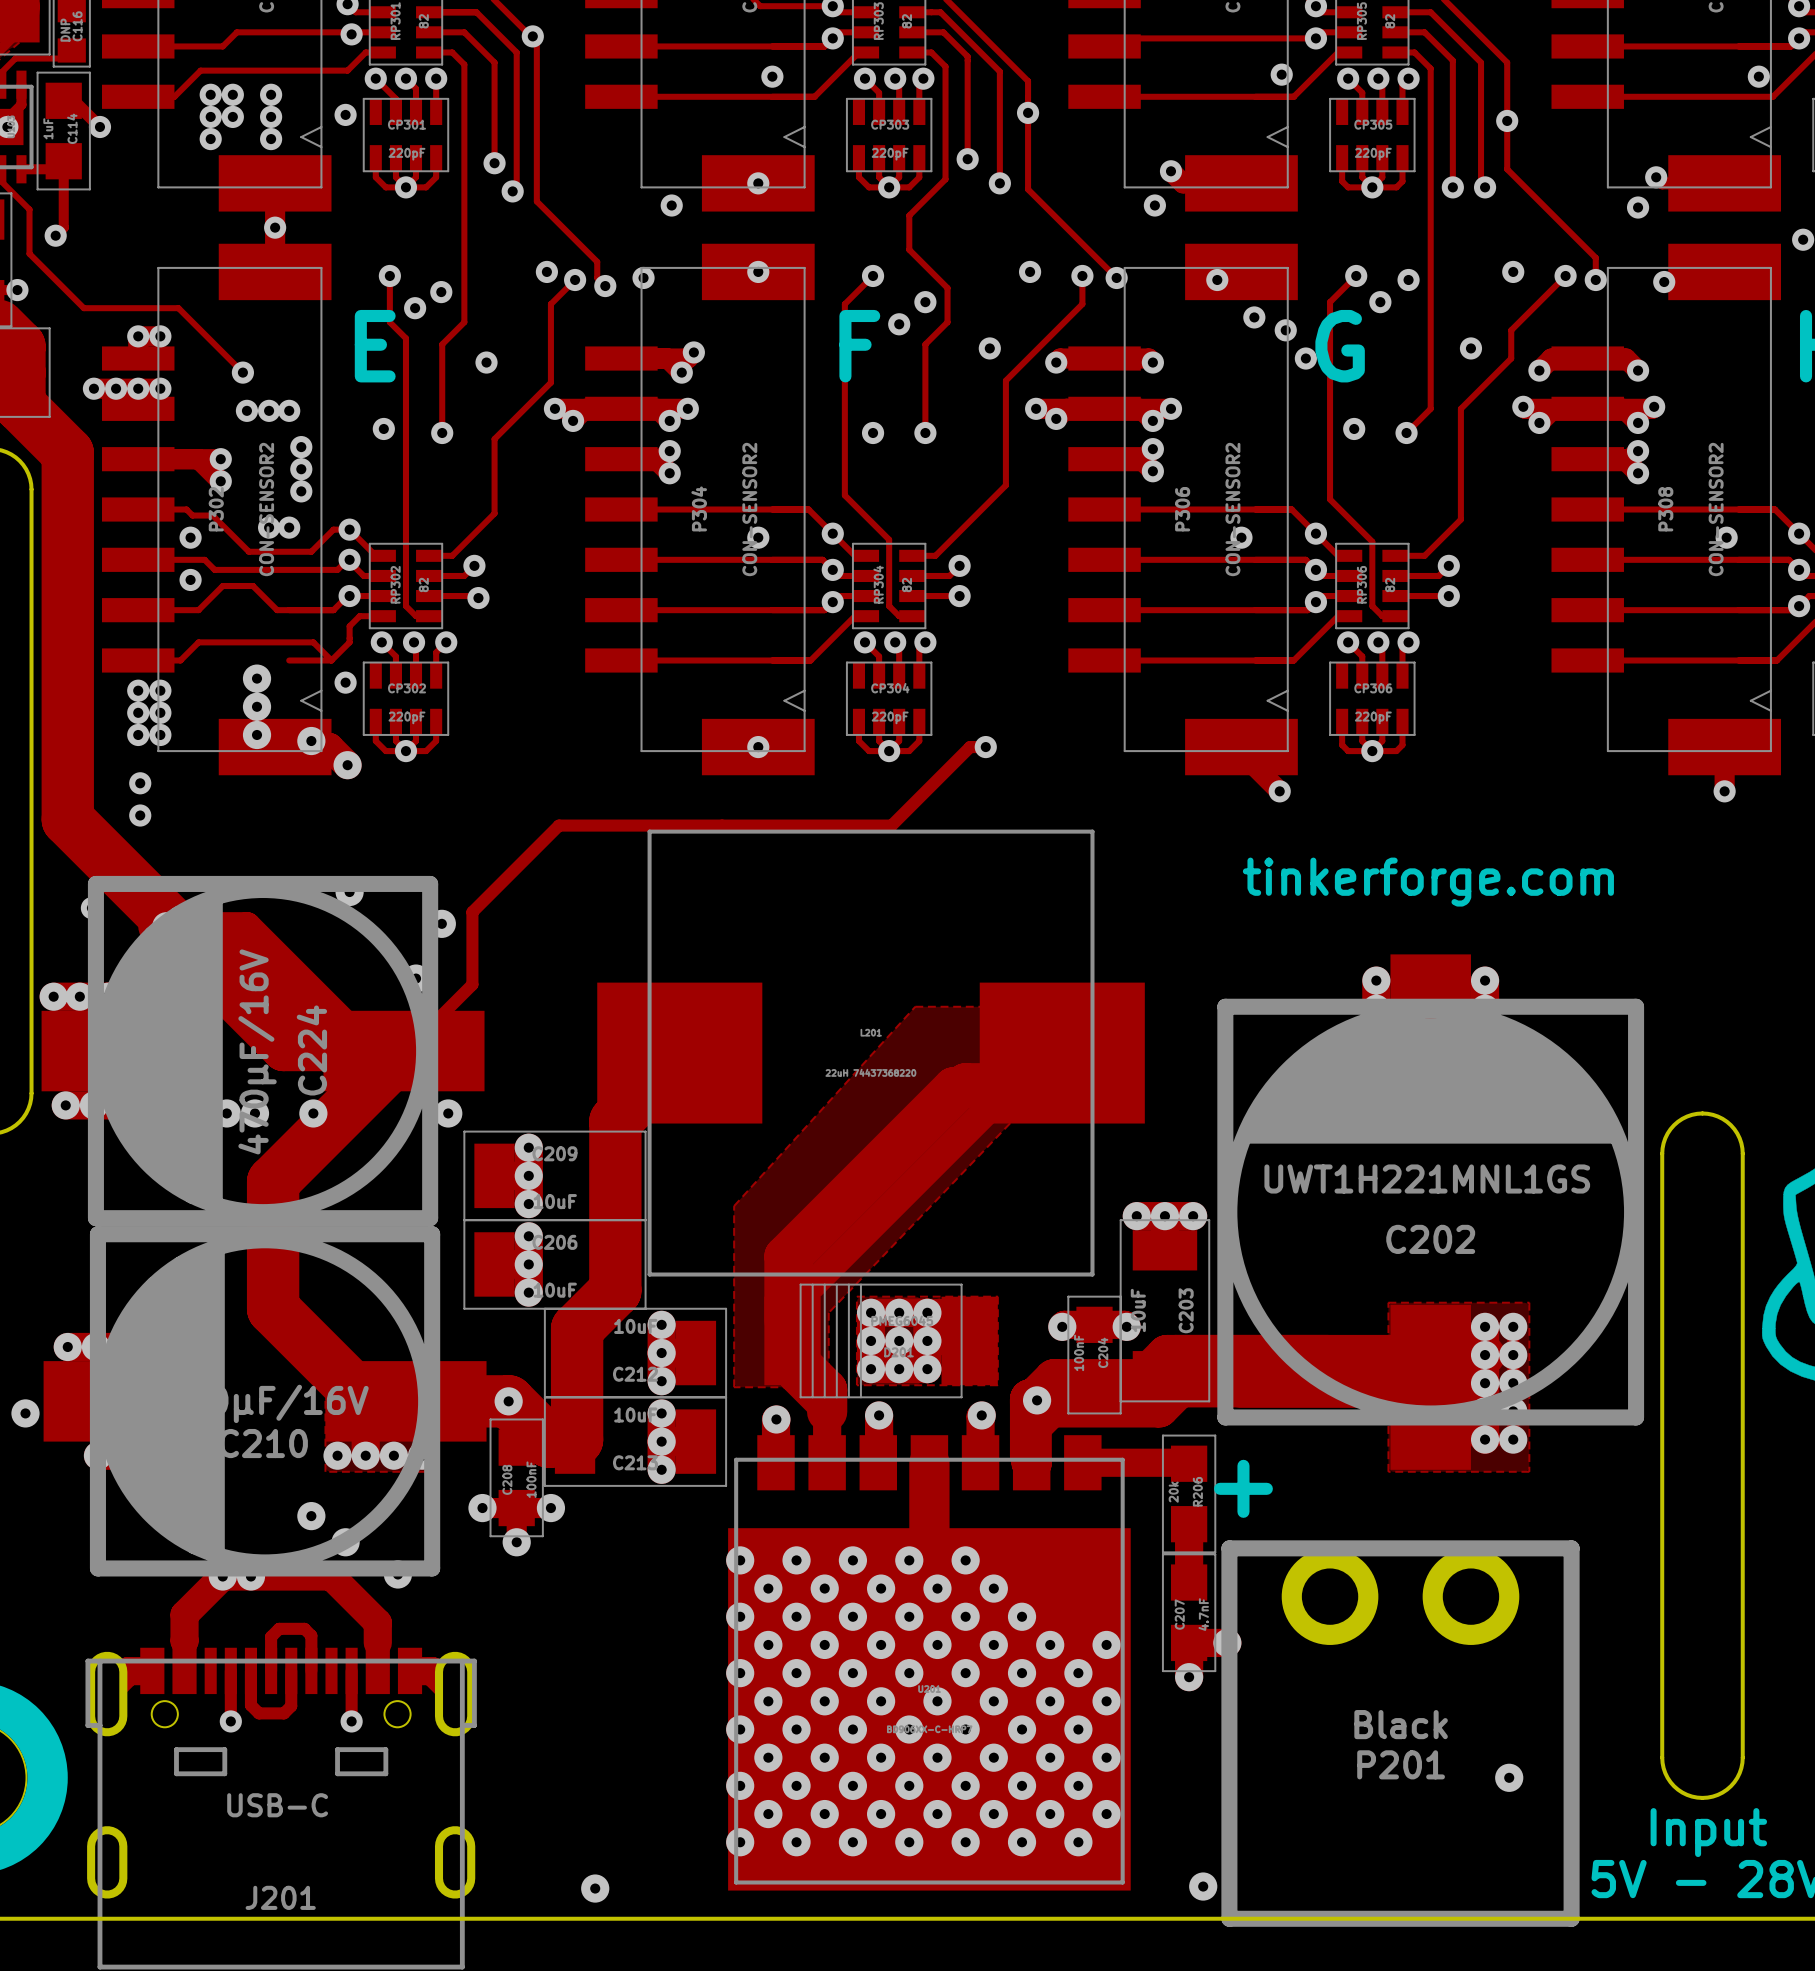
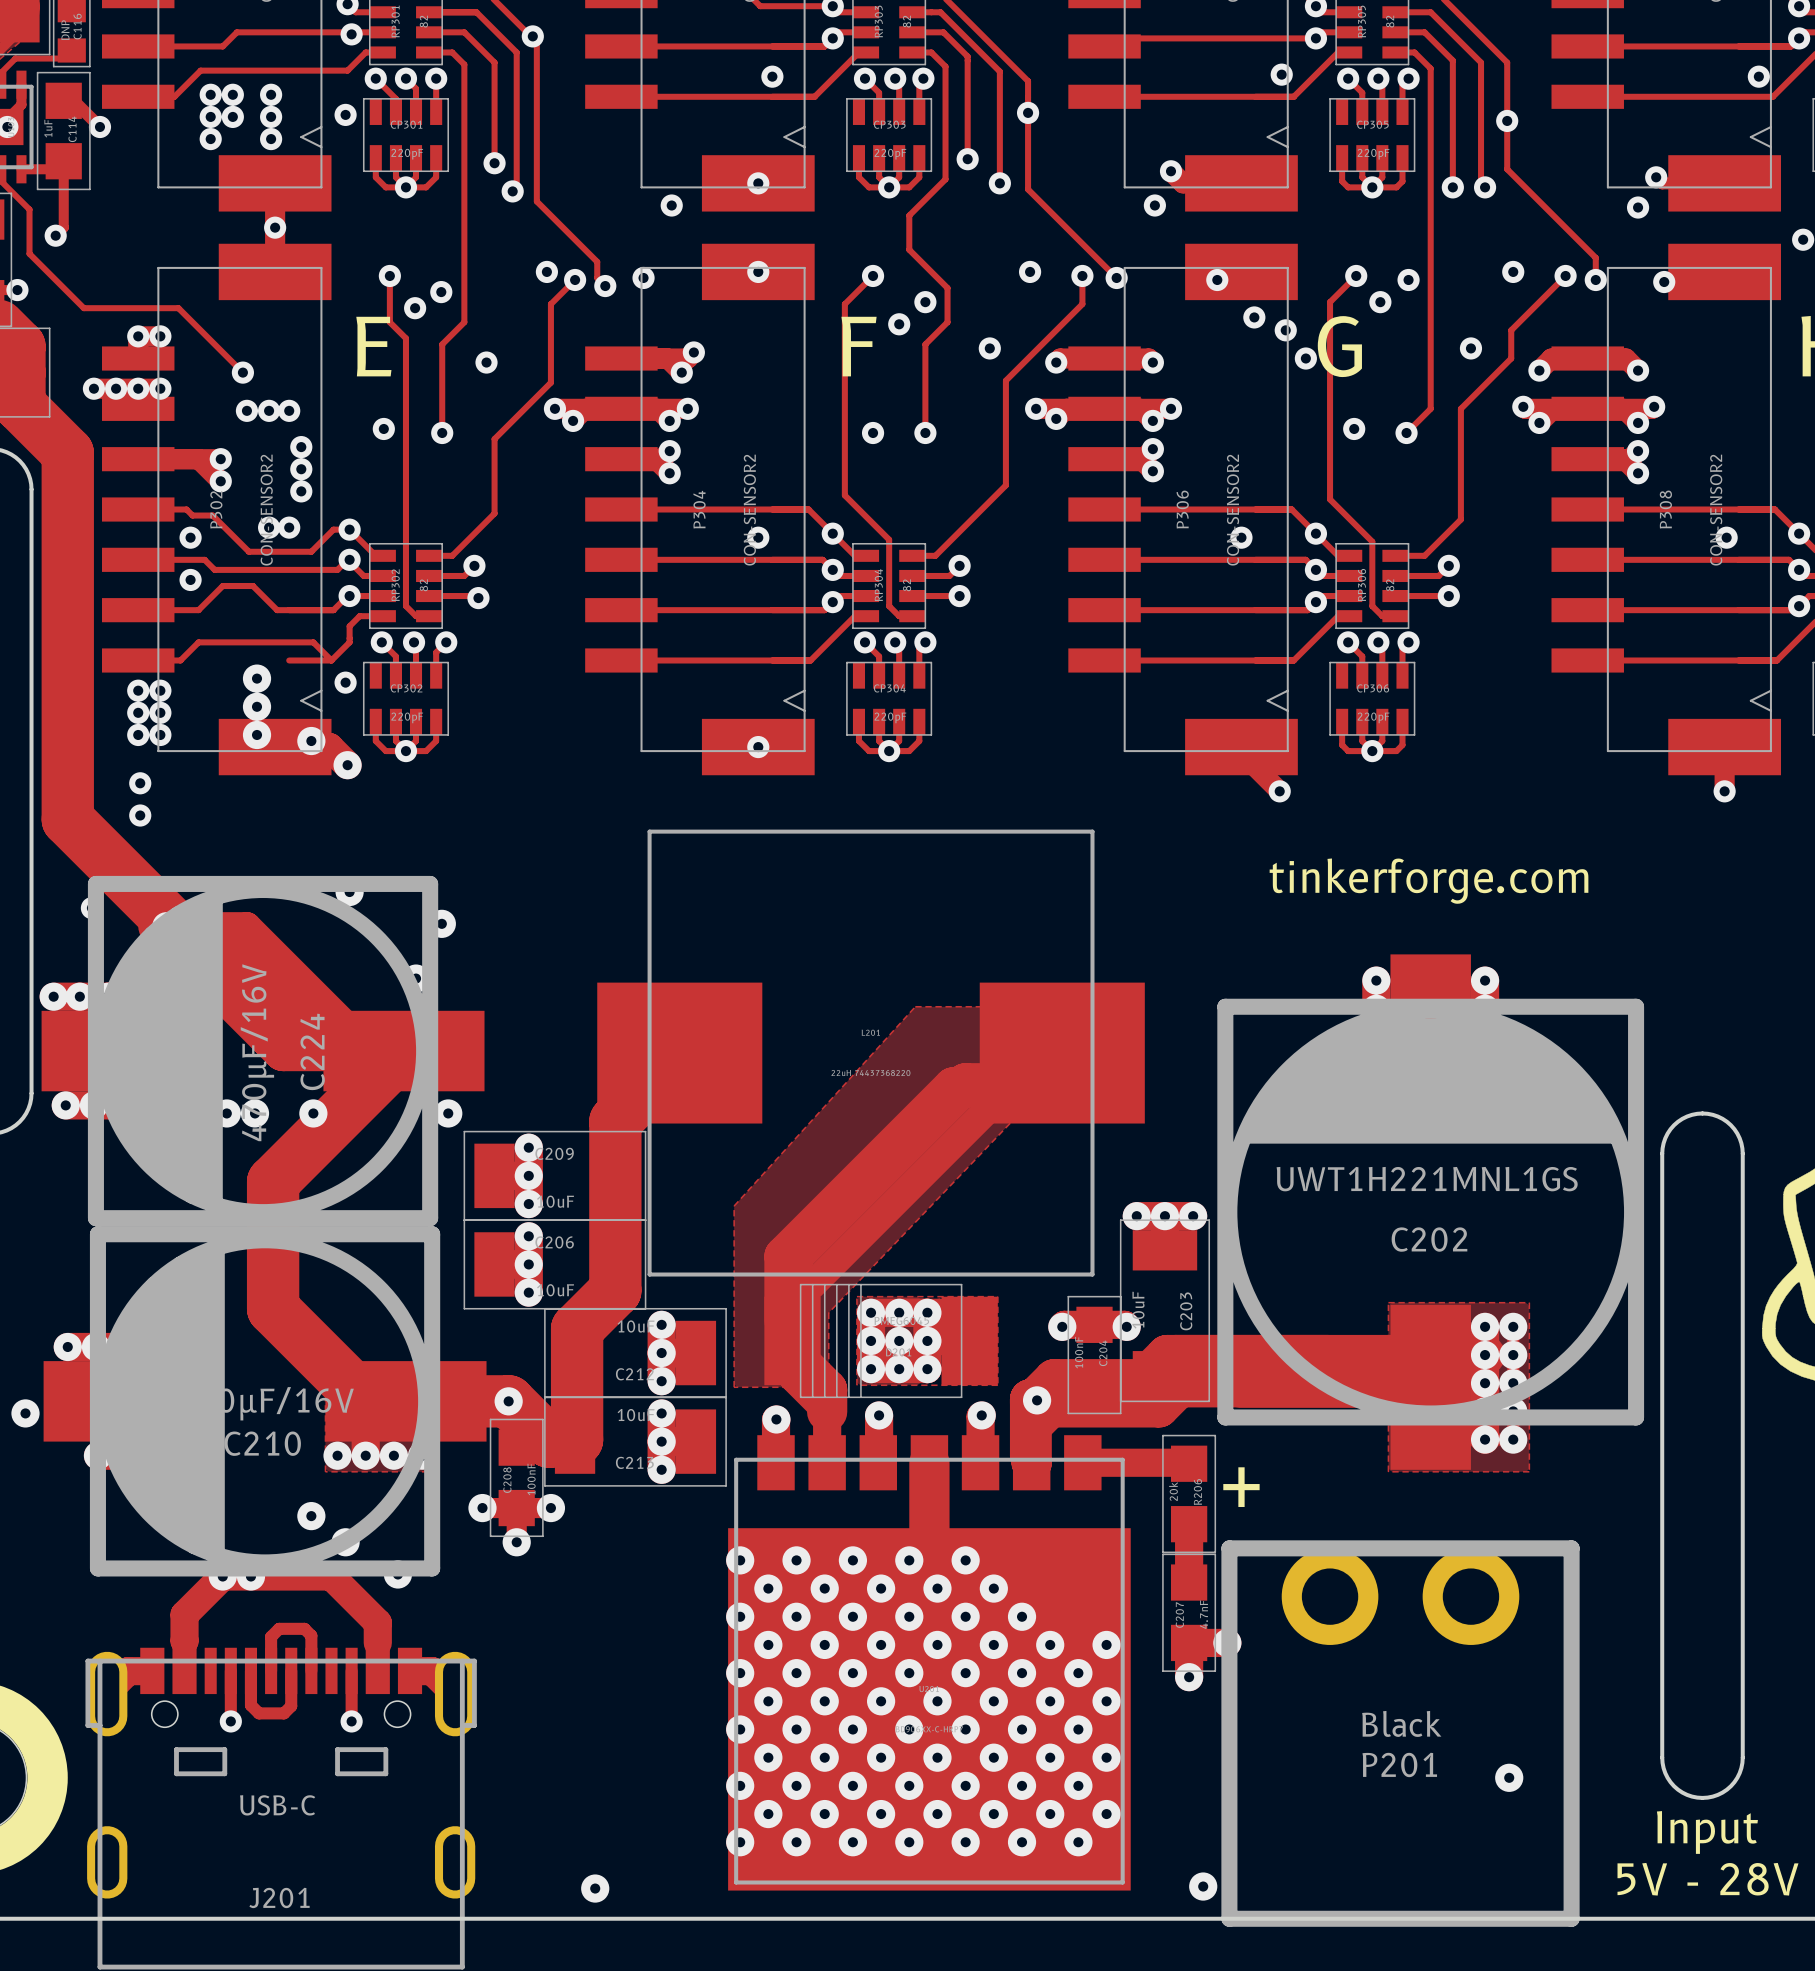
track: (985, 747) (970, 747) (891, 825) (558, 825) (472, 912) (472, 984) (403, 1053) -> none
via: (985, 747) -> none

